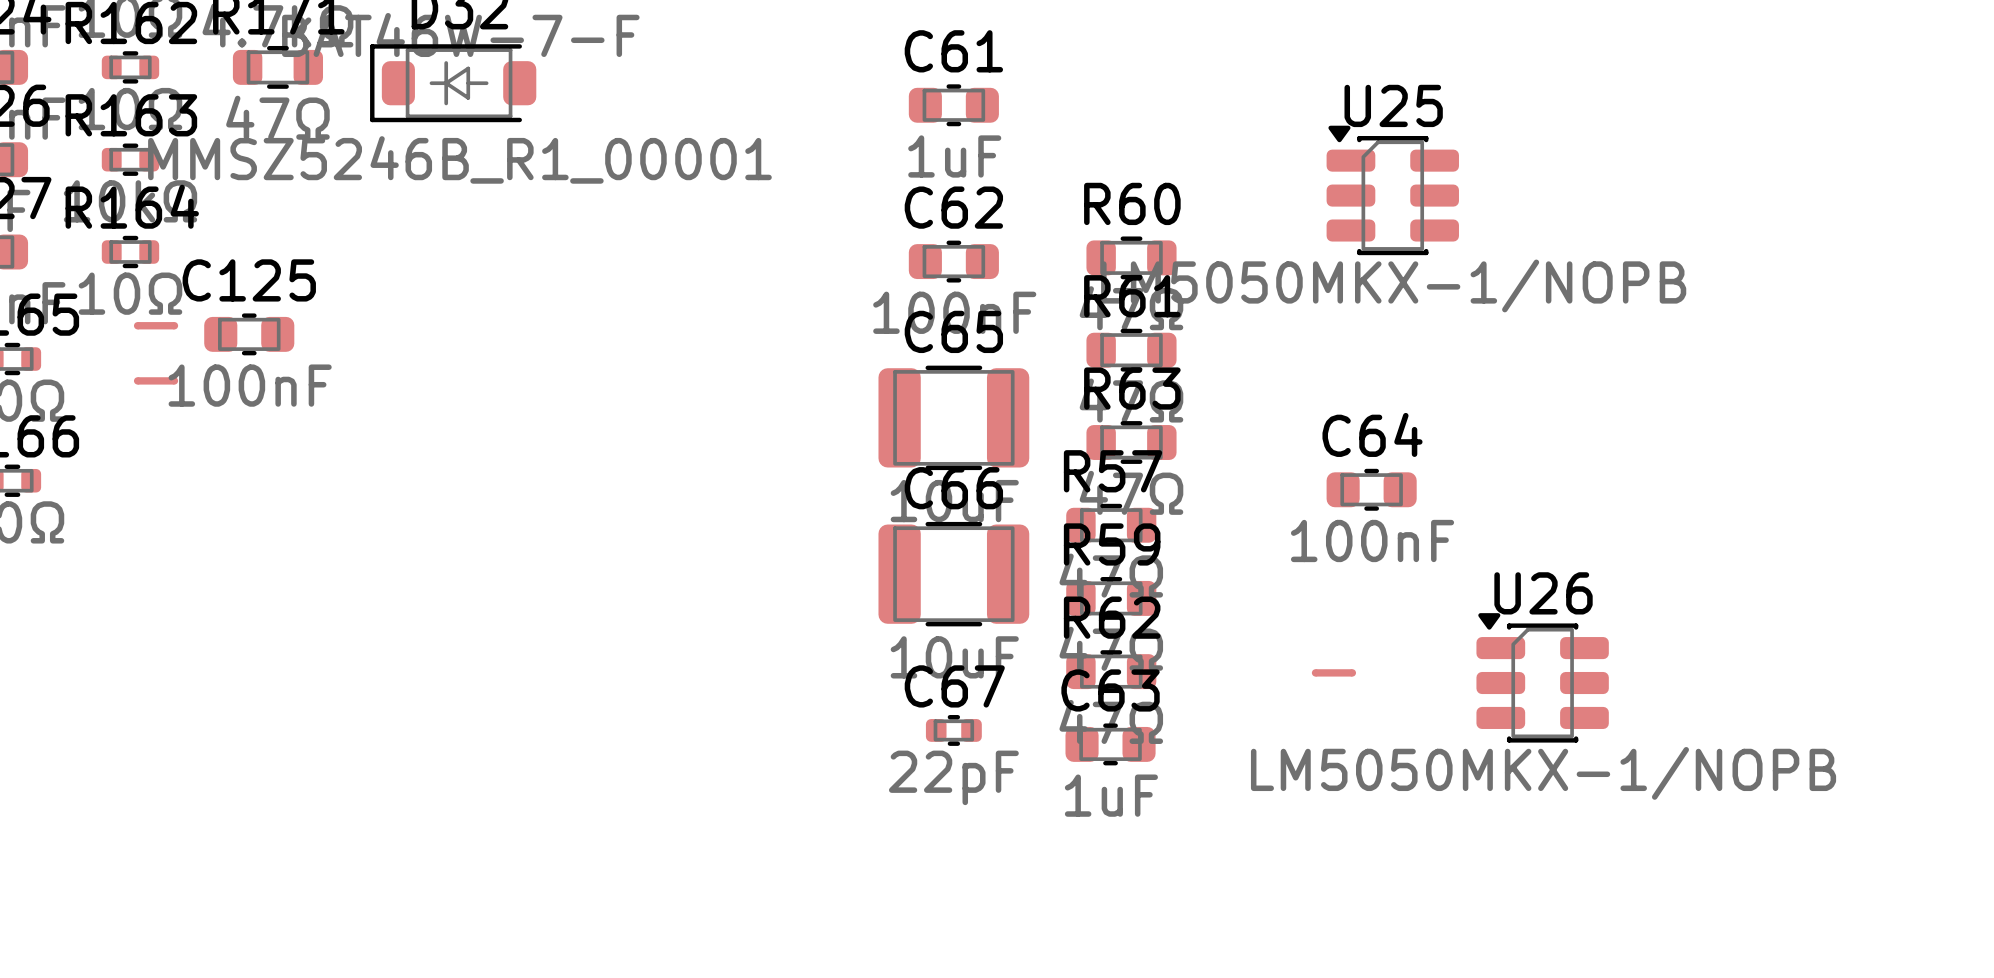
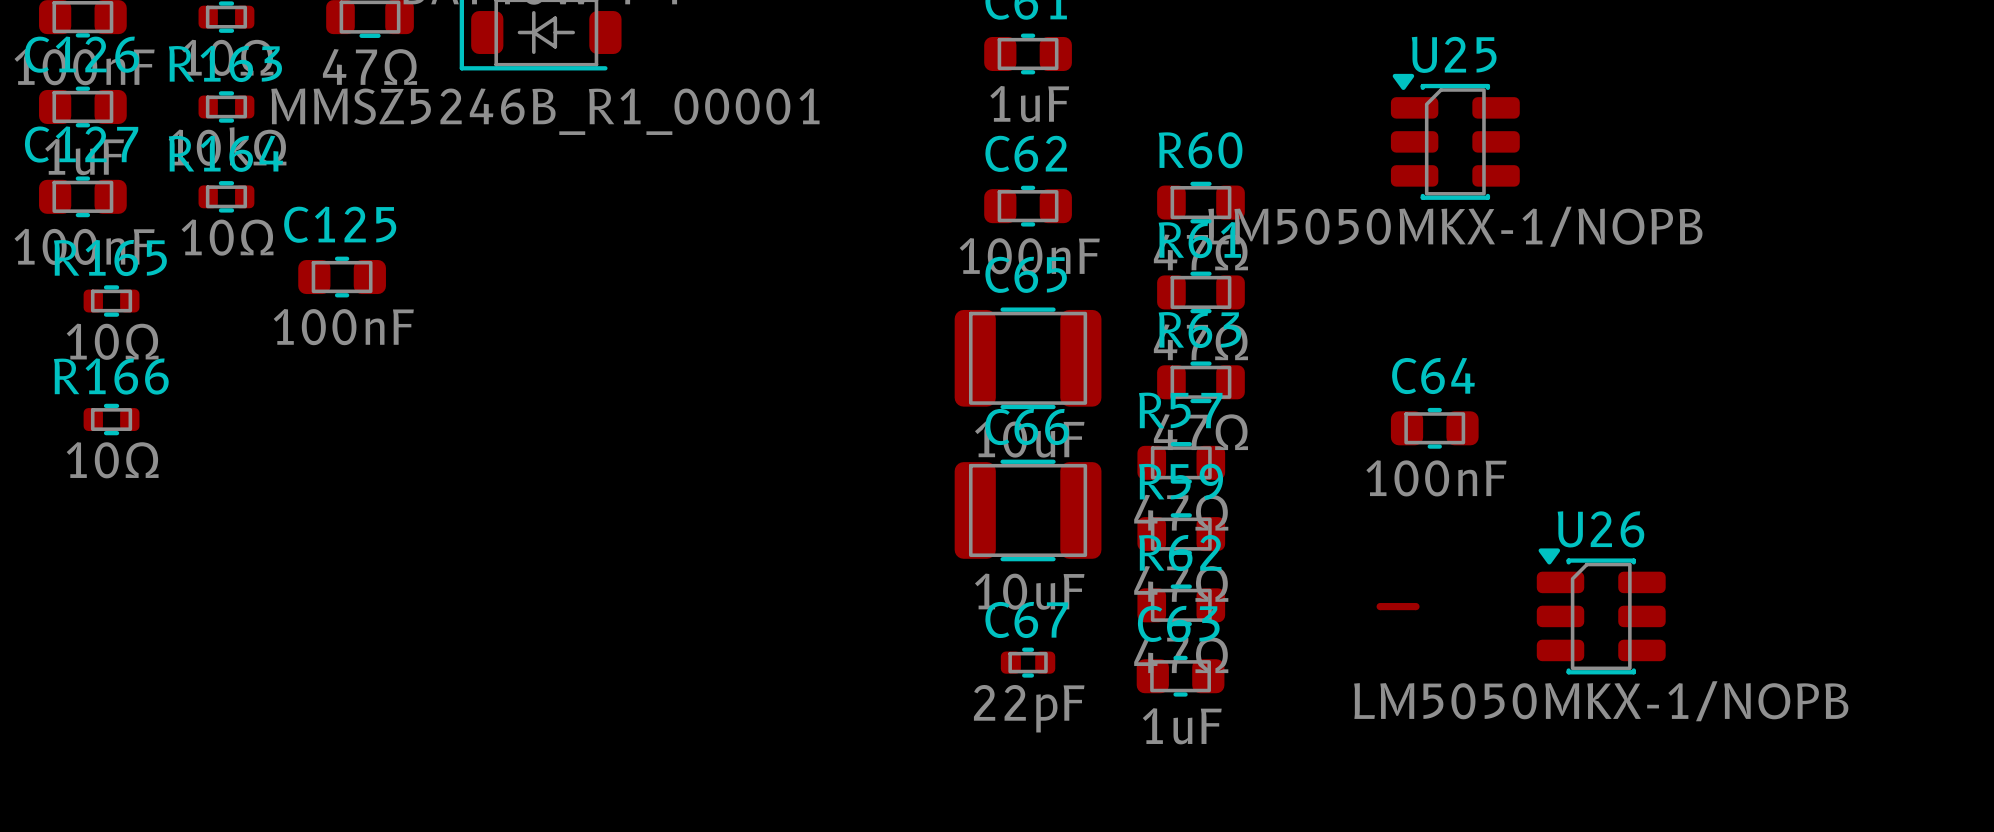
part: (156, 325) -> none
part: (156, 380) -> none

